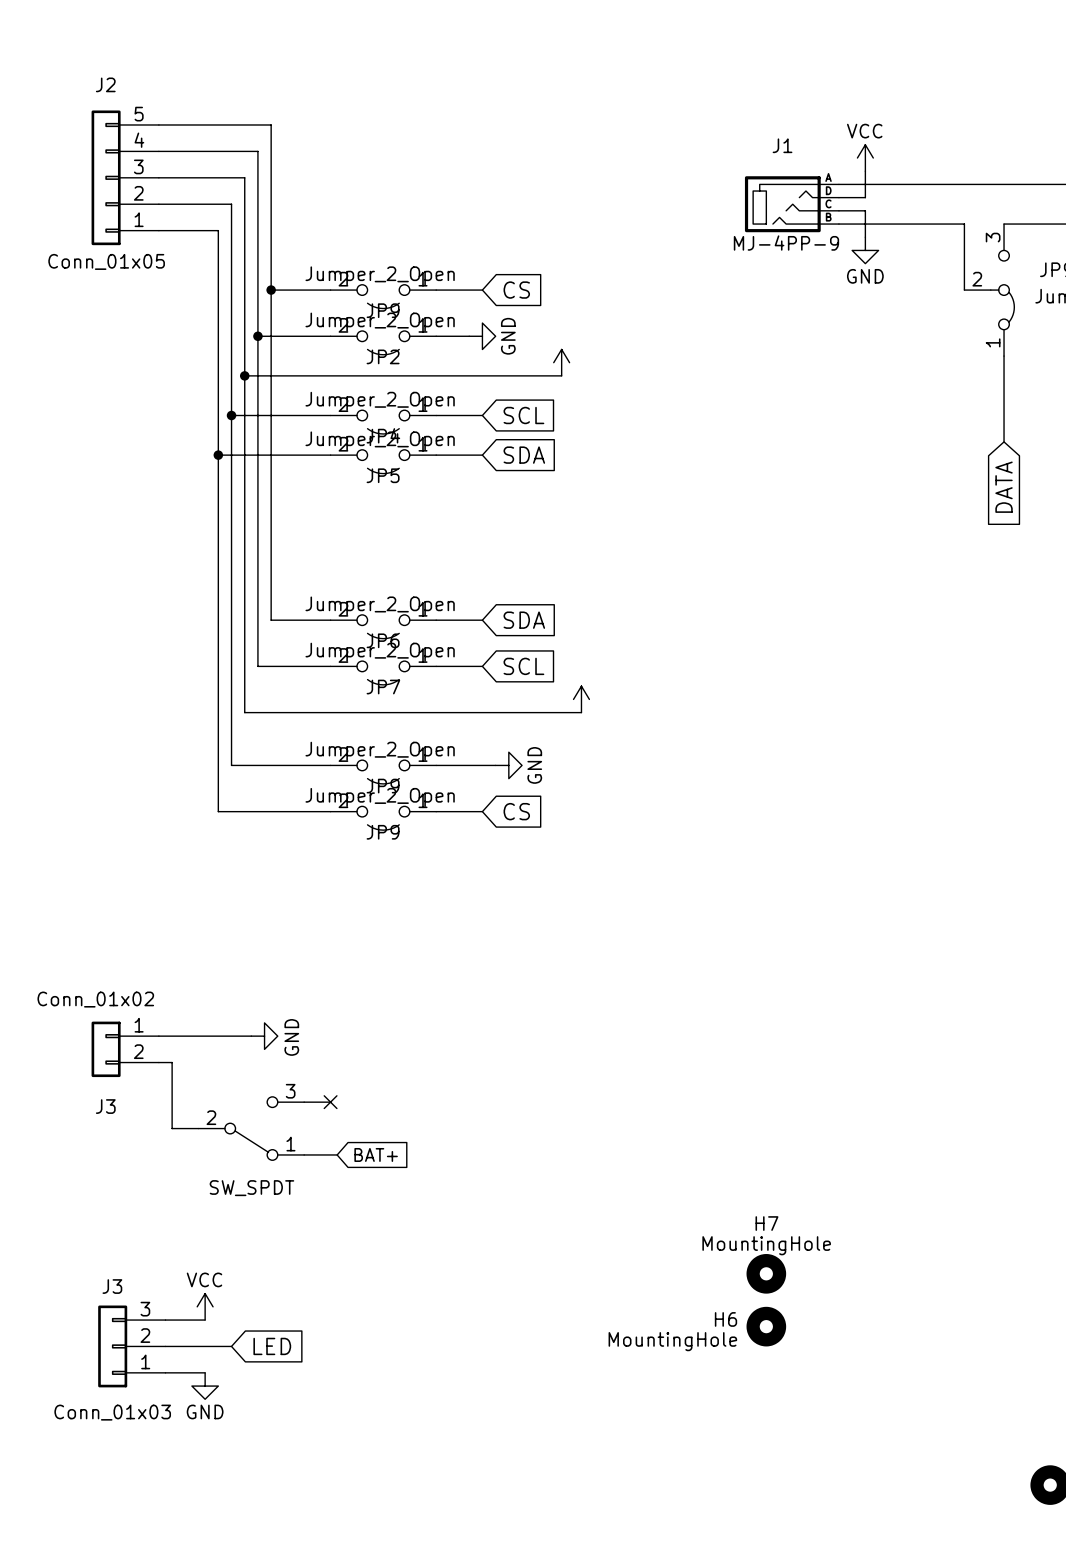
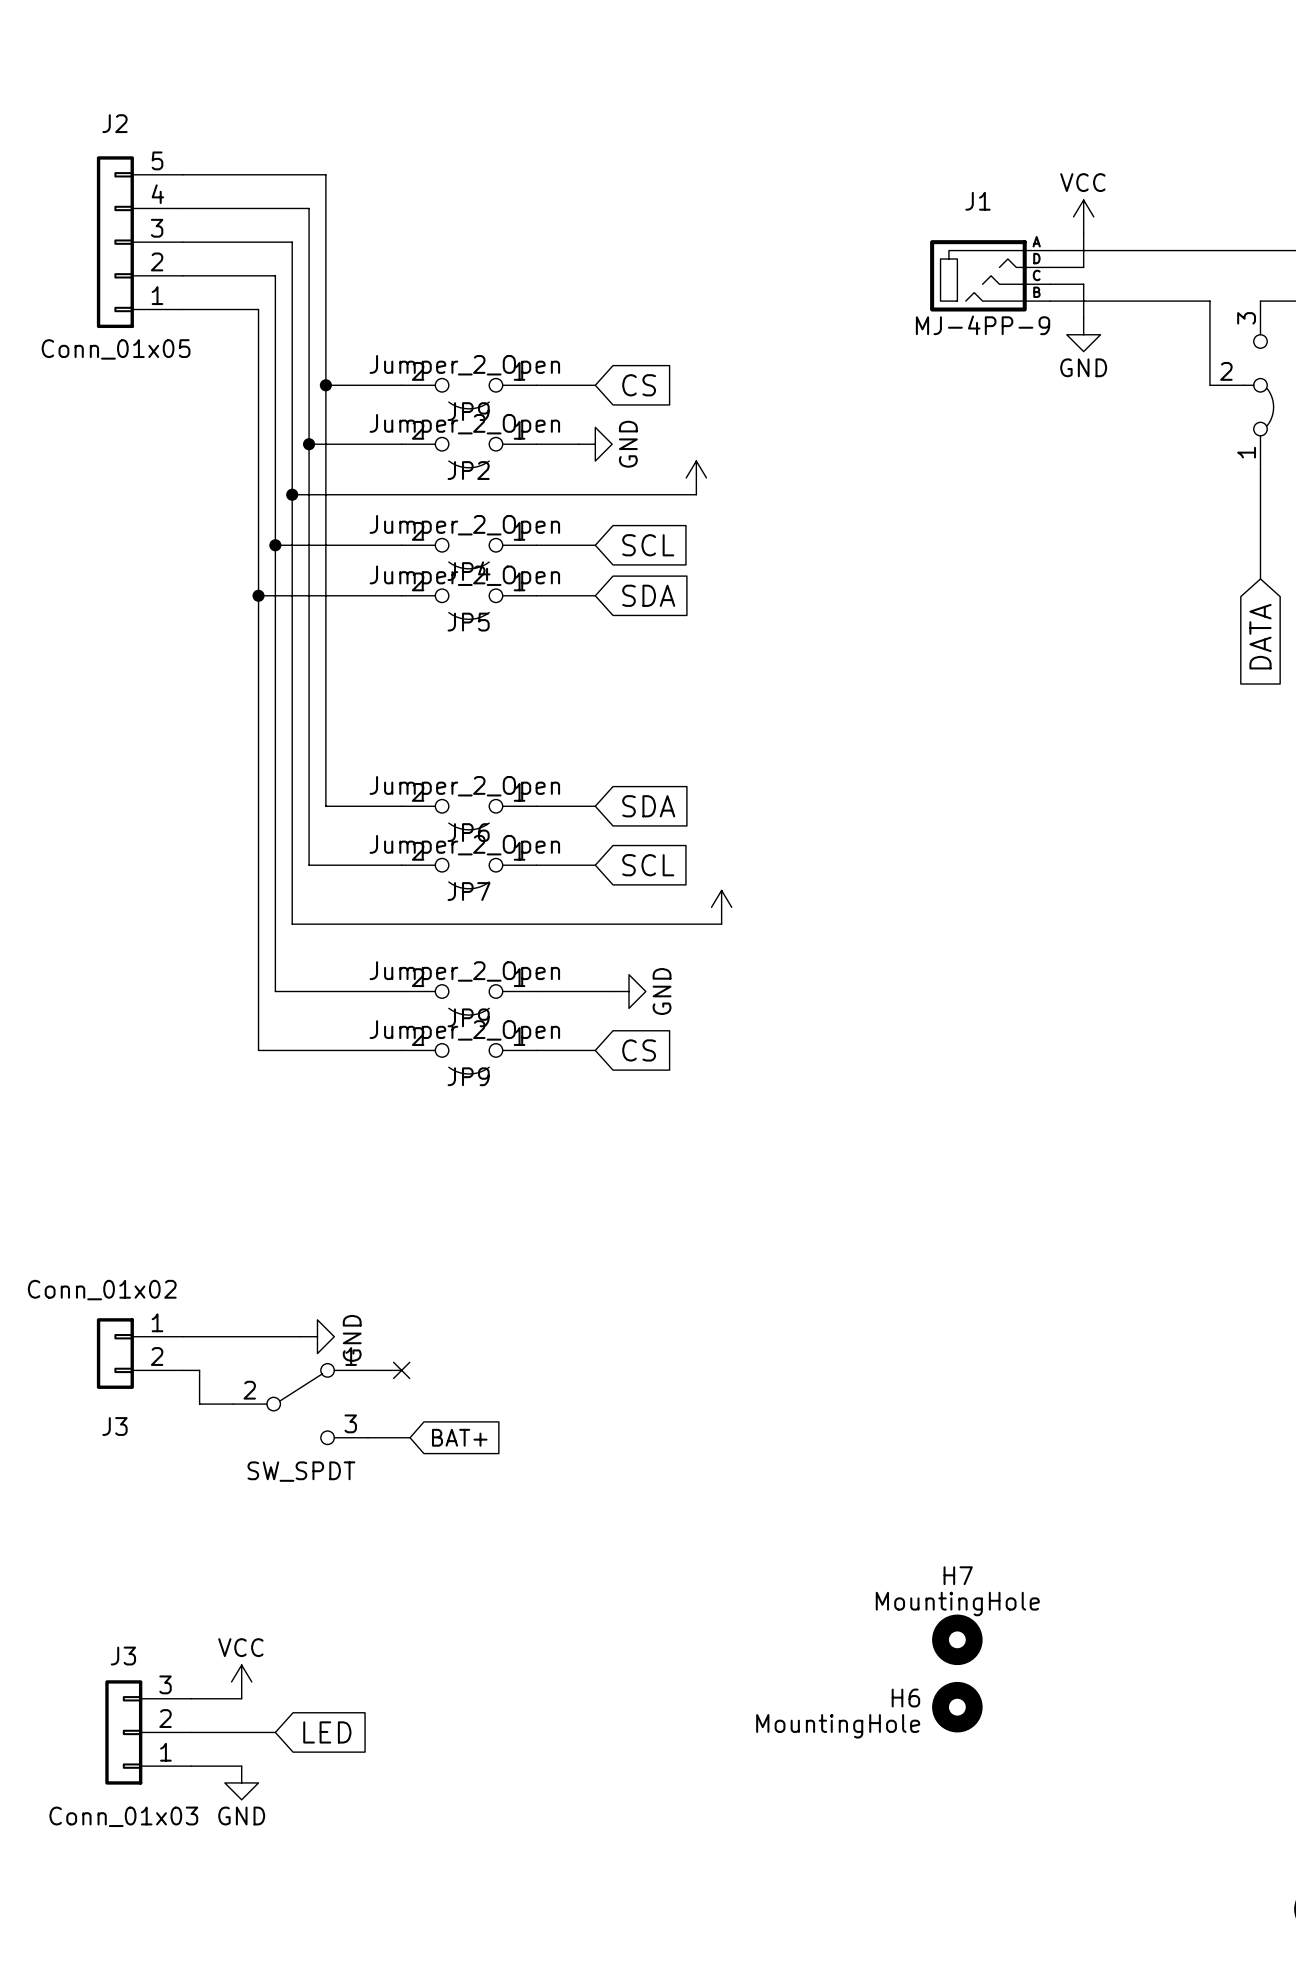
wire: (172, 1088) (172, 1128) (198, 1128) -> (199, 1404) (233, 1404)
part: none -> SW_SPDT (300, 1404)
wire: (304, 1102) (330, 1102) -> (367, 1370) (401, 1370)
no-connect mark position: (330, 1102) -> (401, 1370)
part: SW_SPDT (251, 1128) -> none
wire: (304, 1154) (337, 1154) -> (367, 1437) (410, 1437)
global label position: BAT+ (376, 1154) -> BAT+ (459, 1437)

